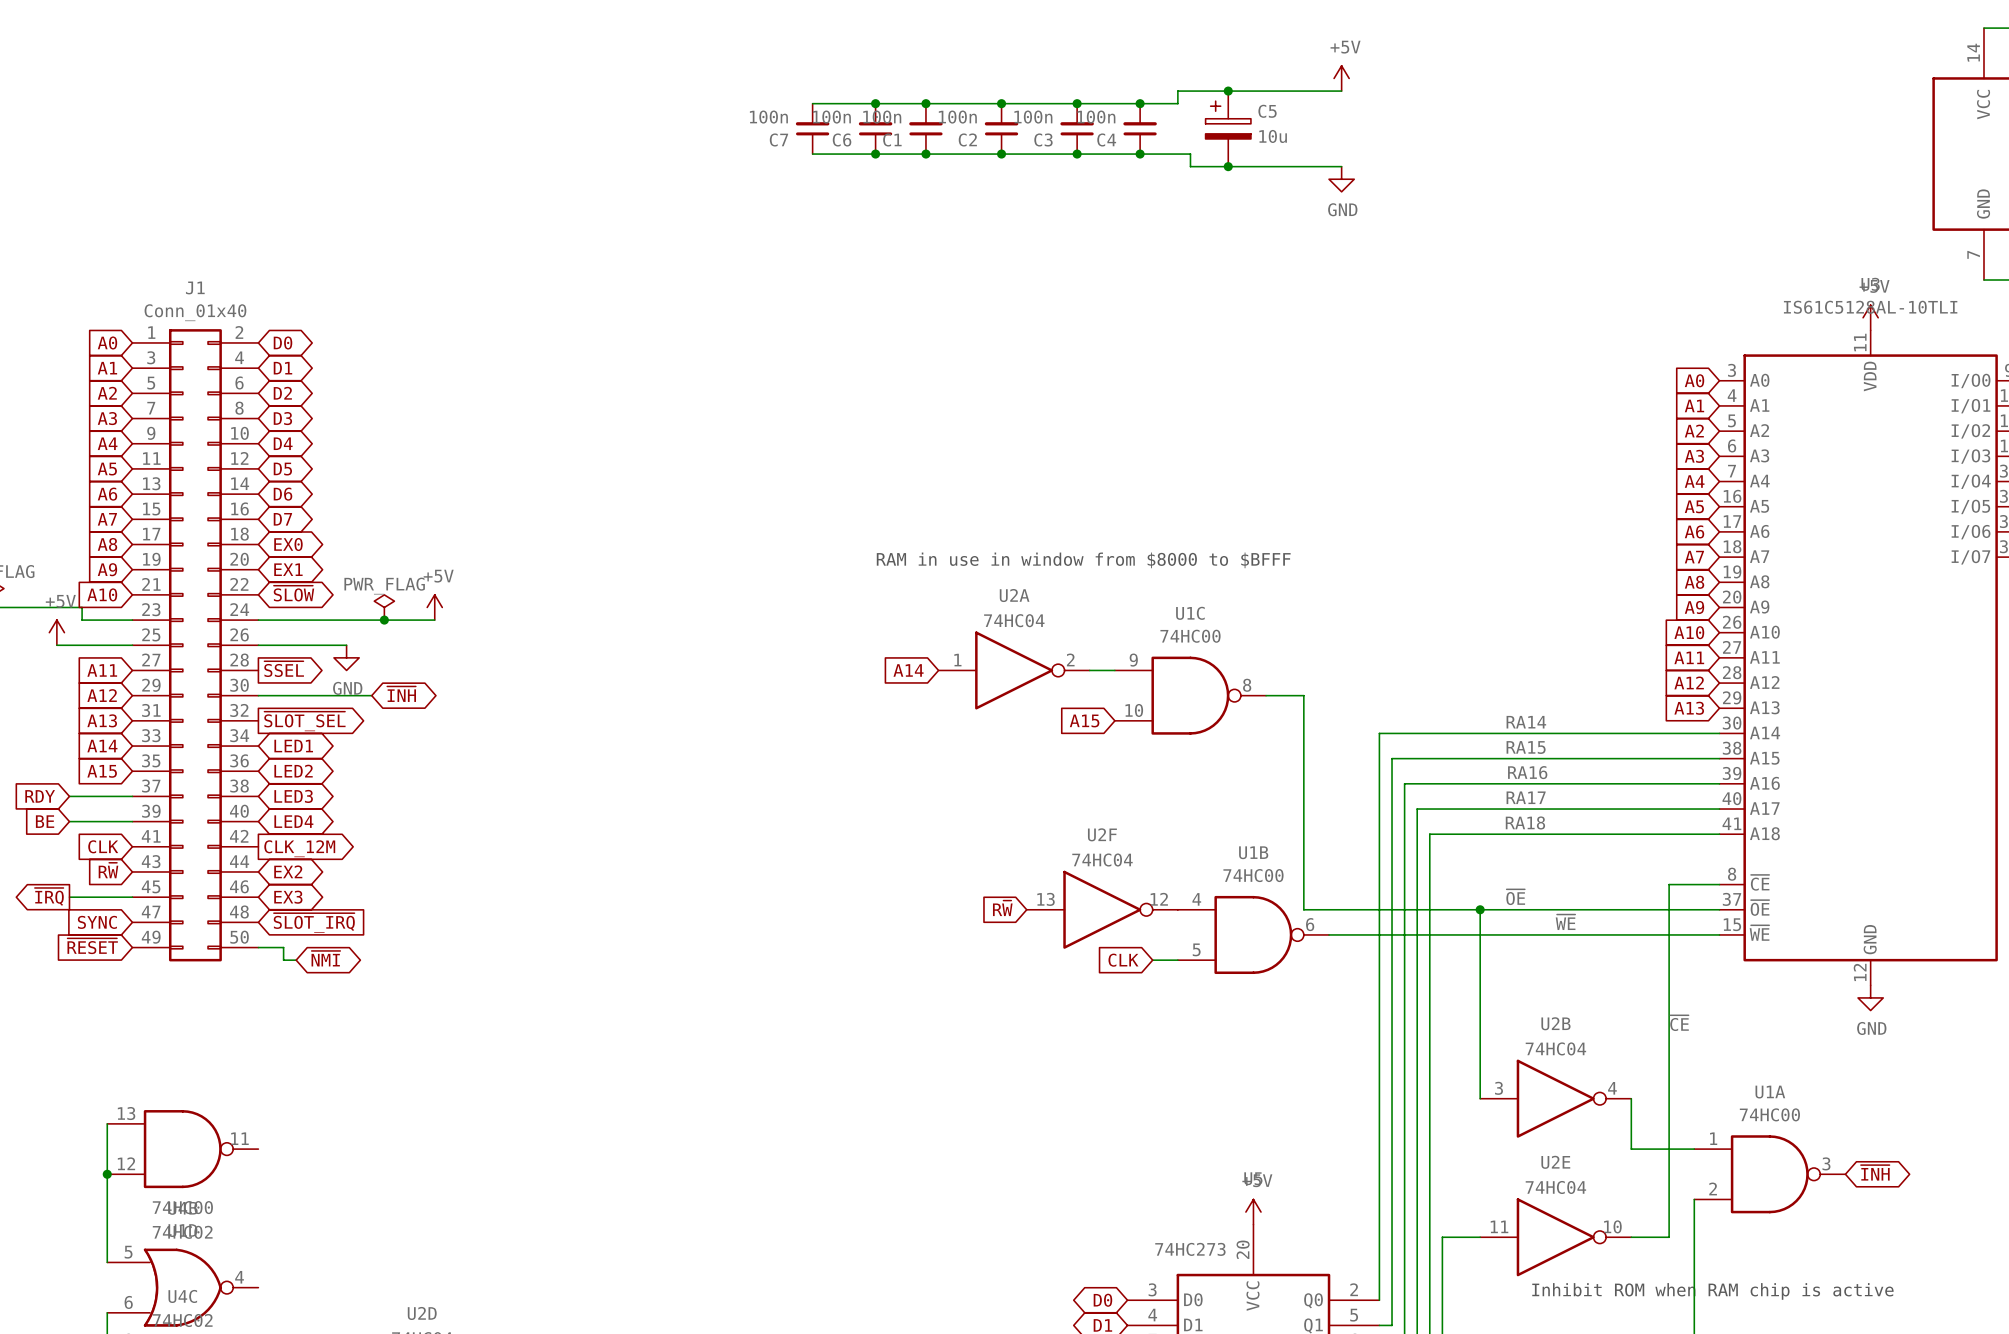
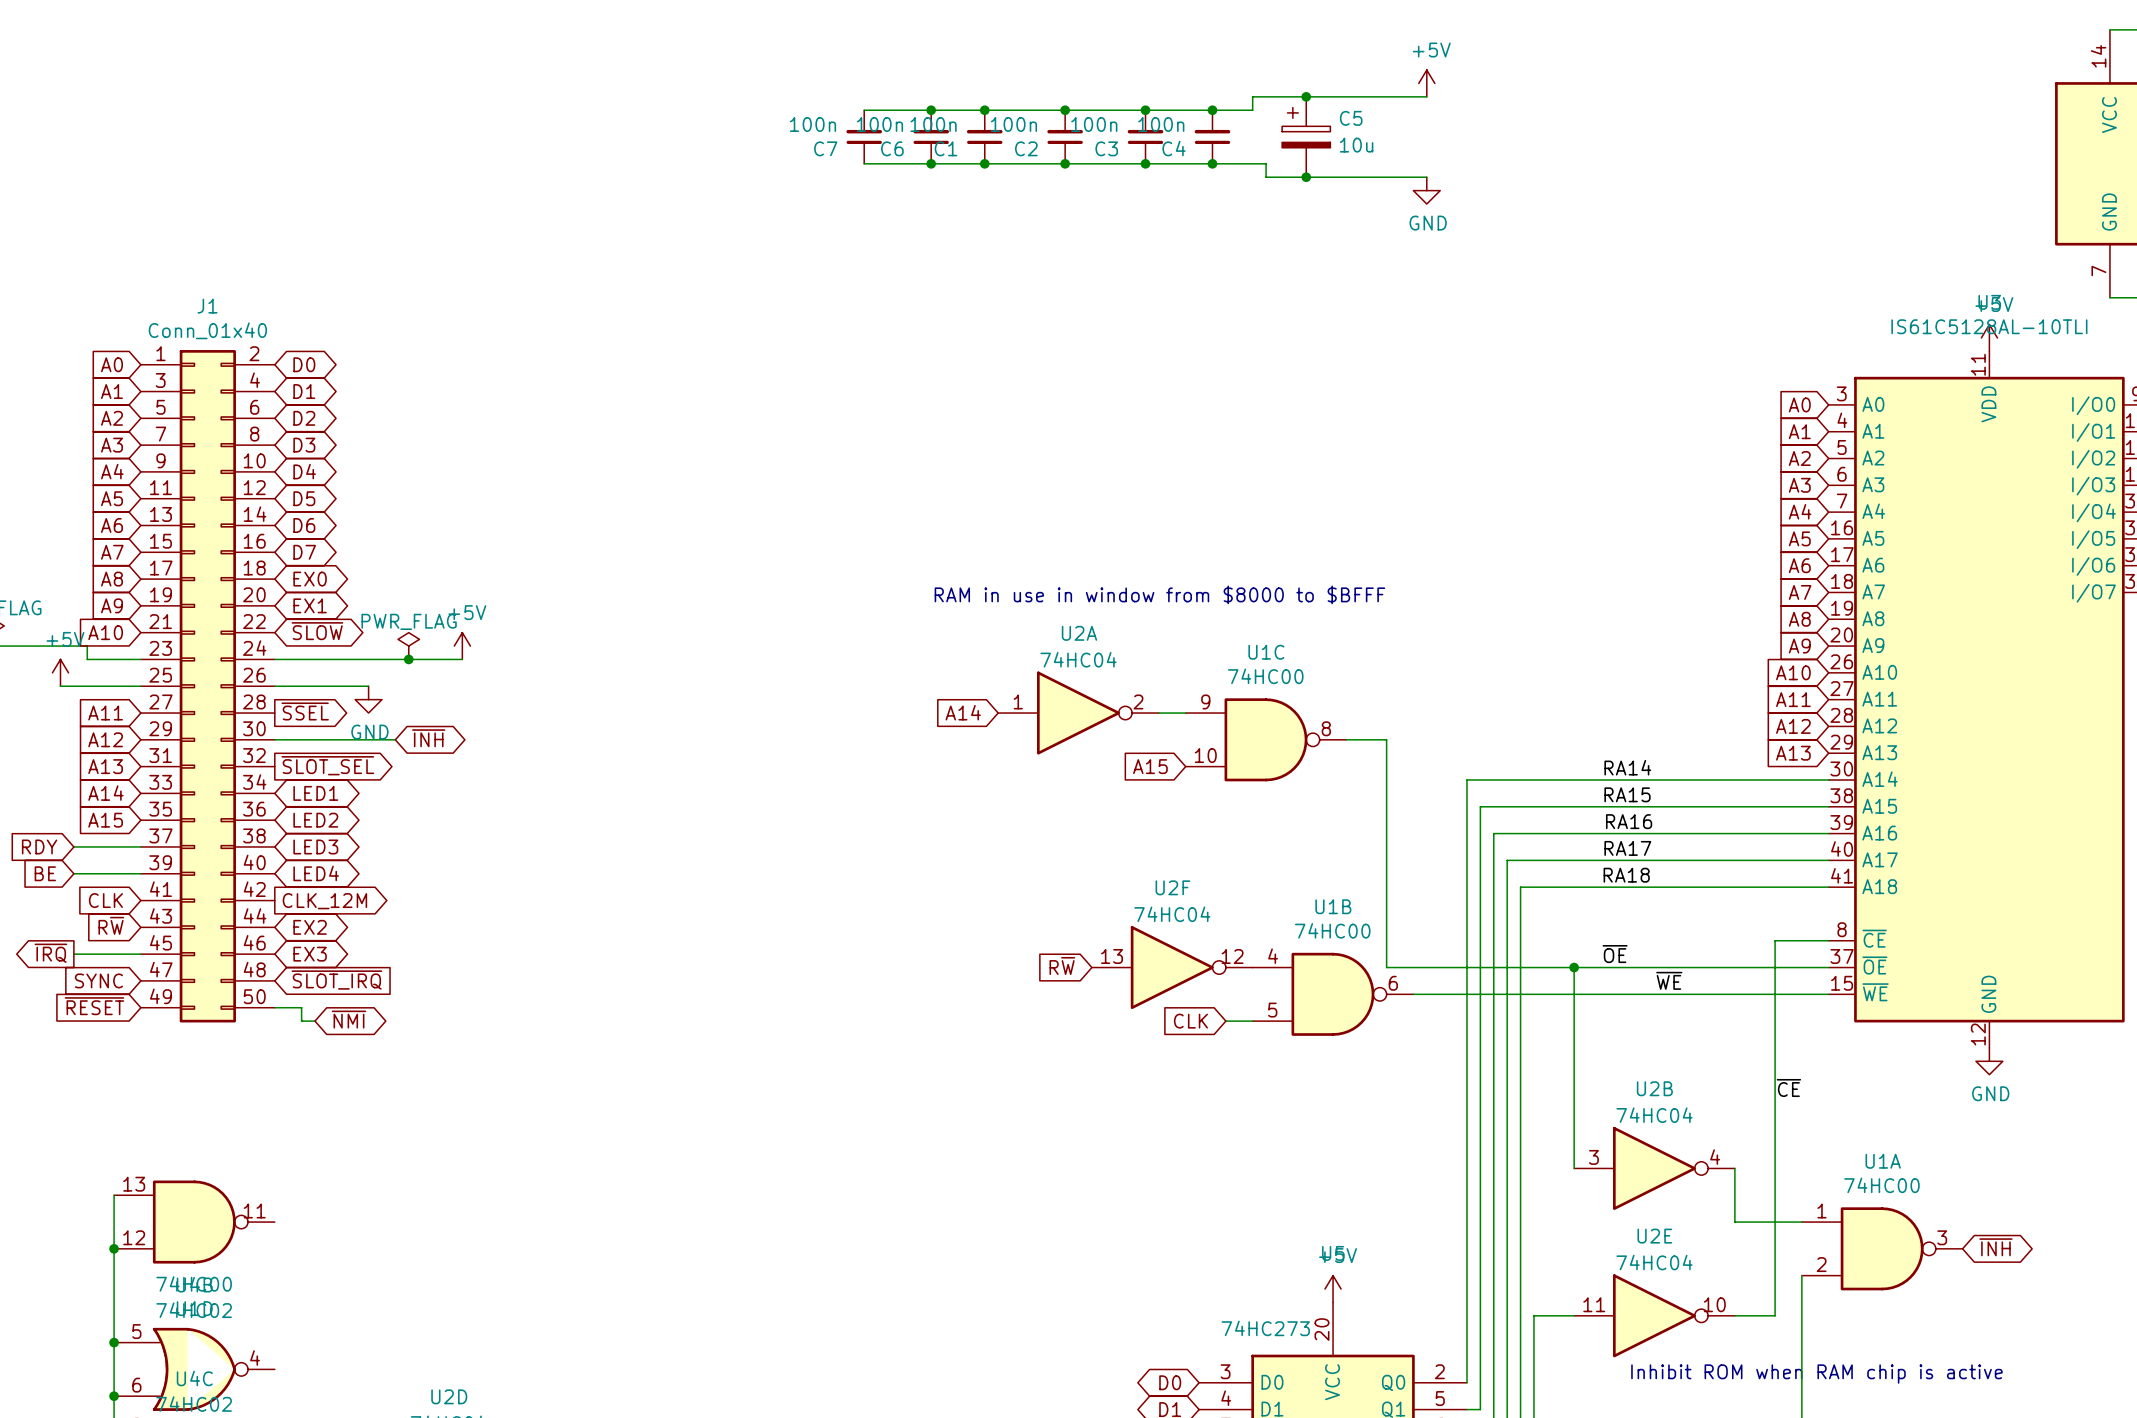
wire: none -> (114, 1342) (114, 1396)
junction: none -> (114, 1342)
junction: none -> (114, 1396)

